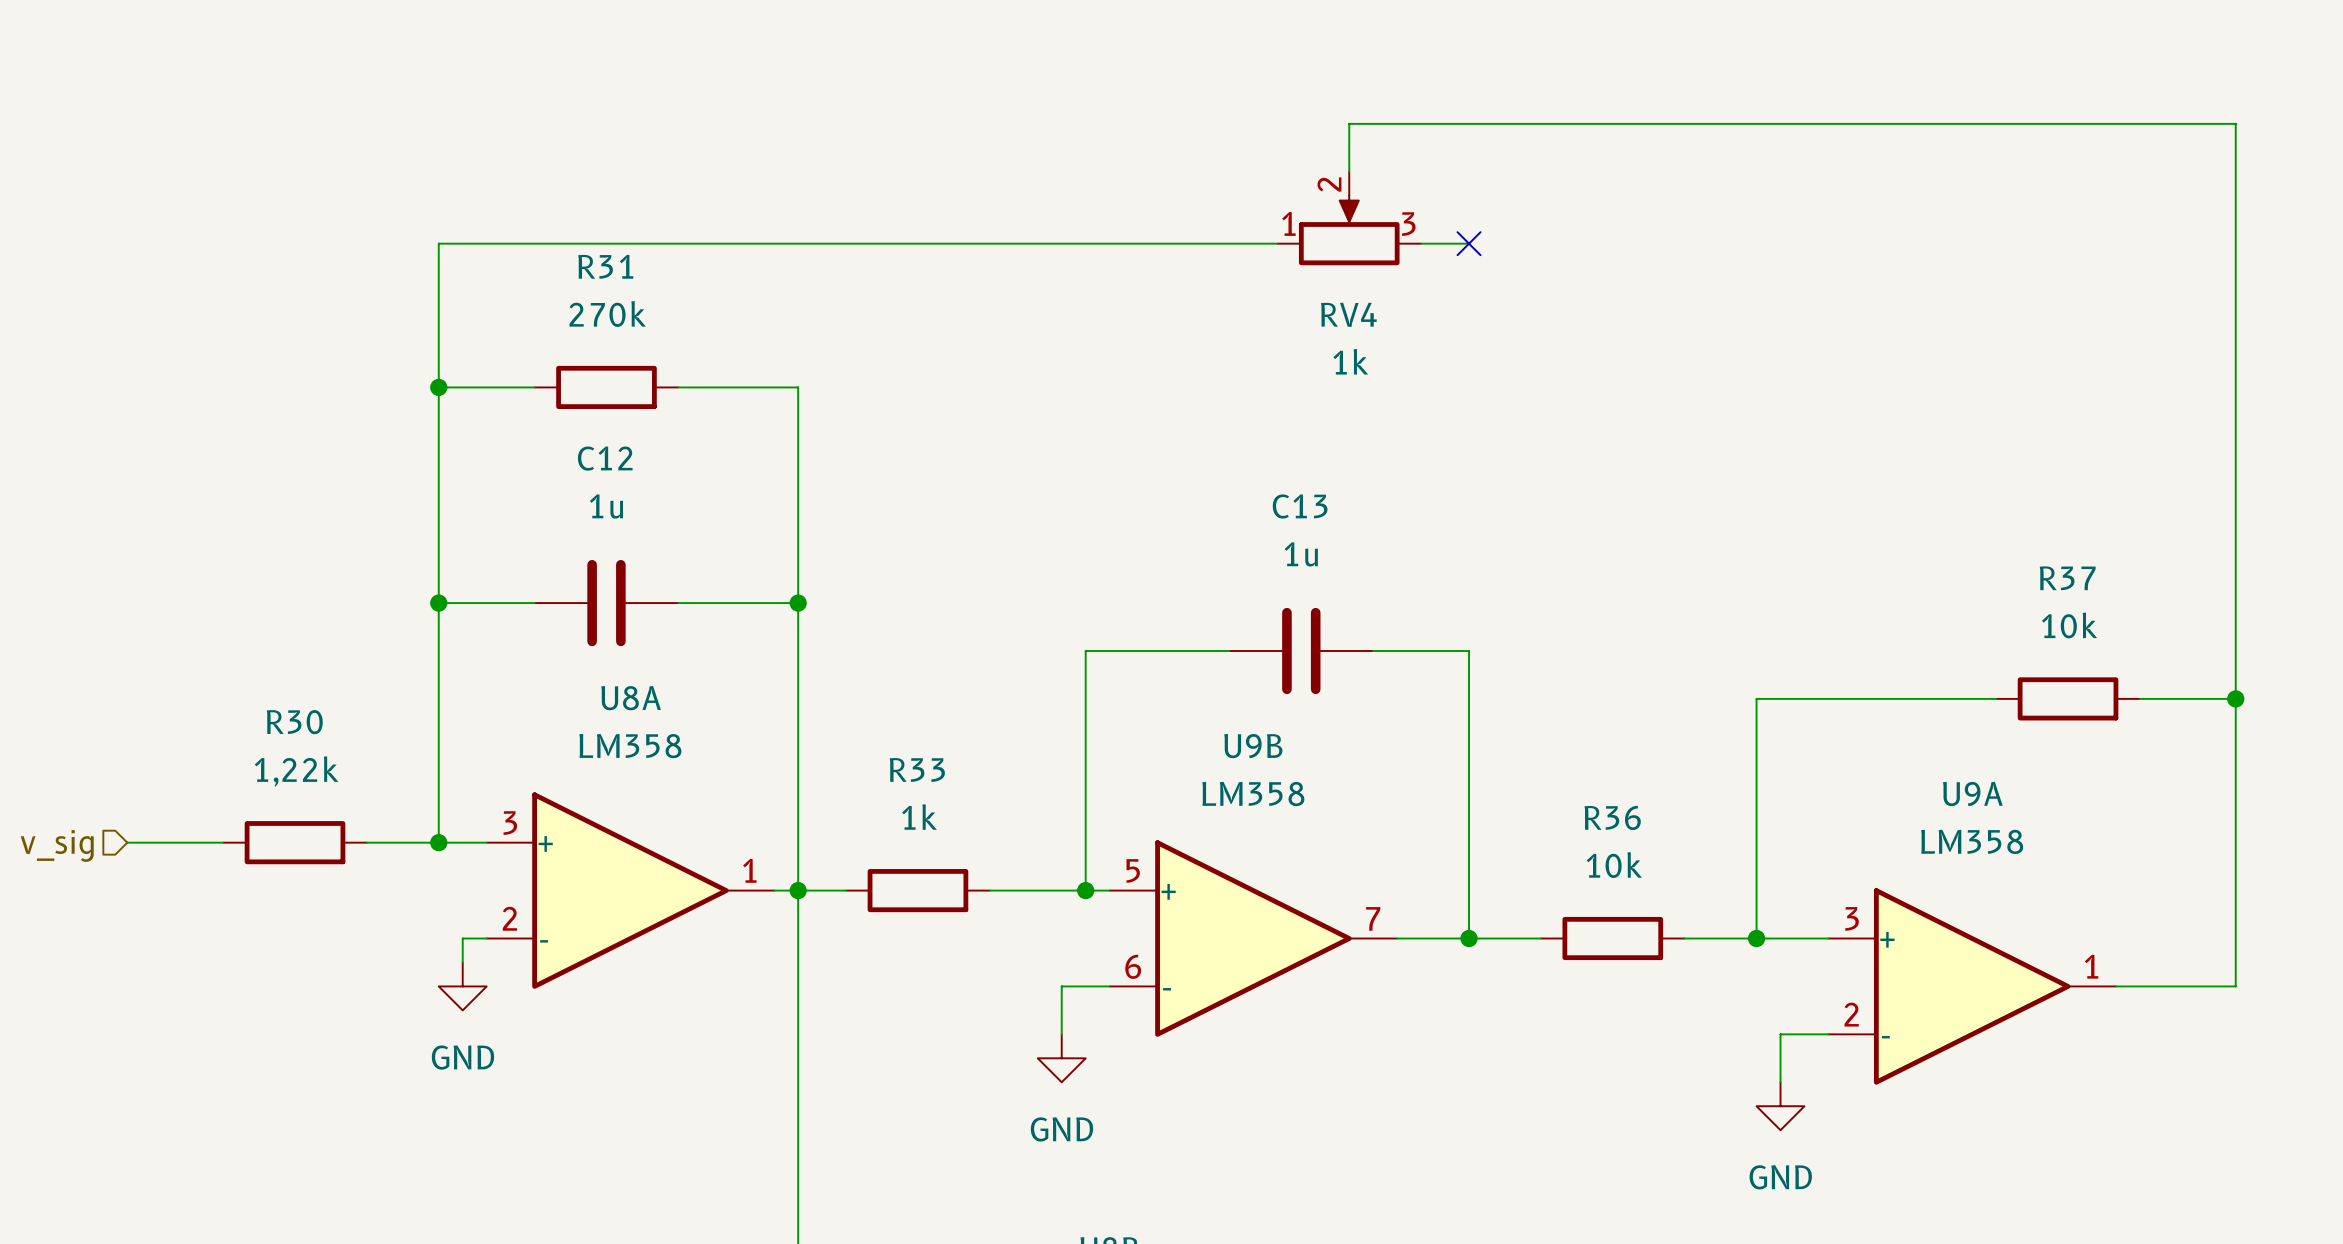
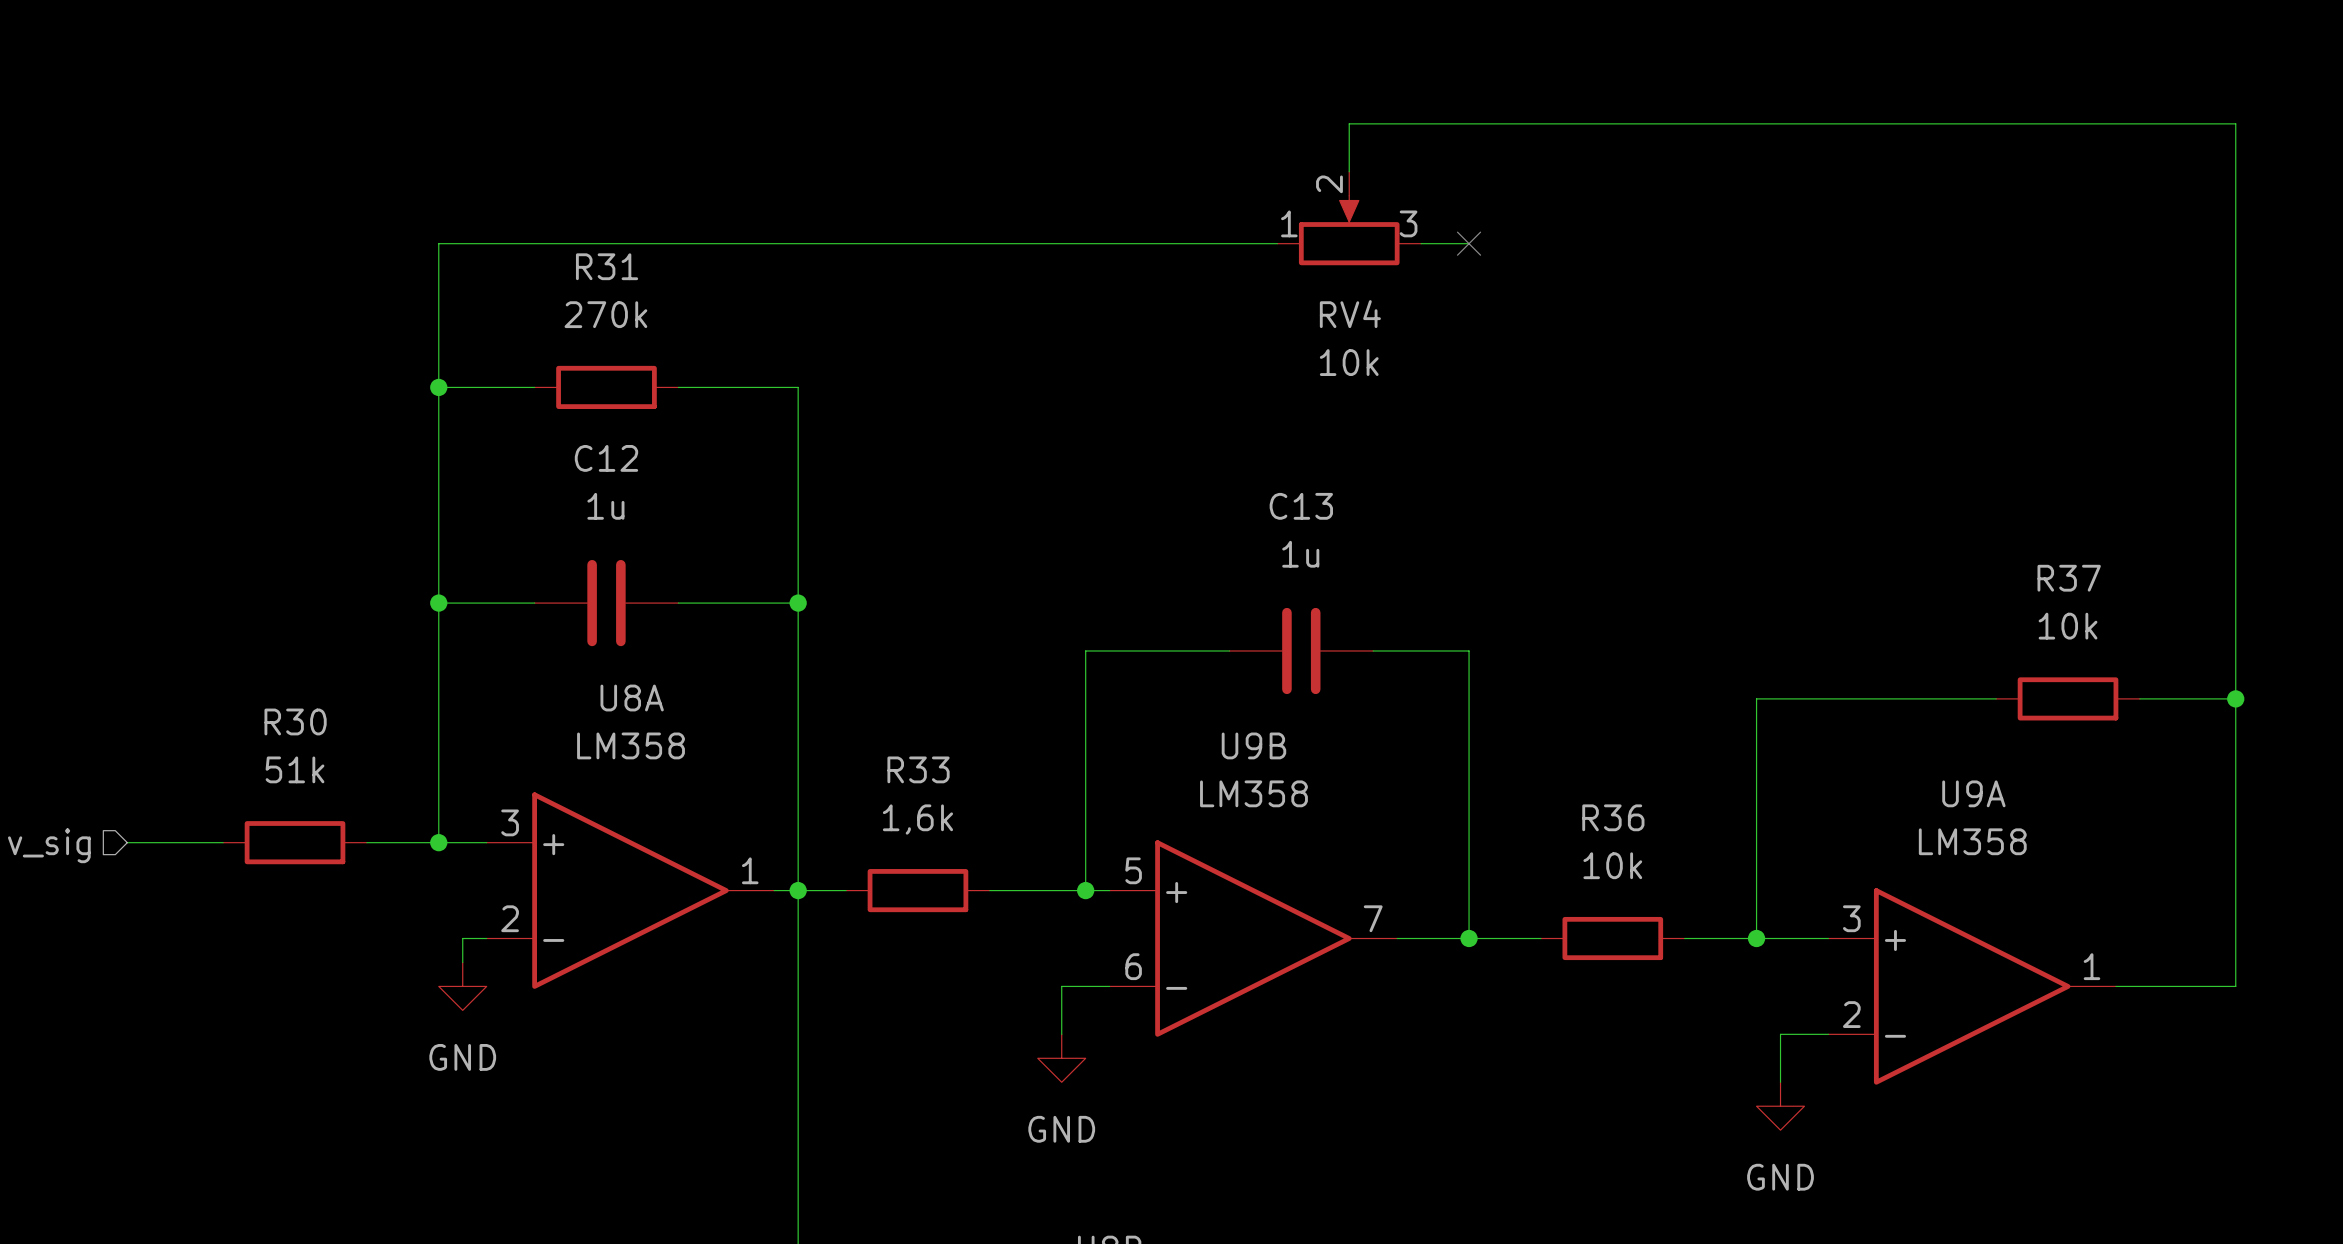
RV4 value: 1k (1350, 361) -> 10k (1349, 362)
R30 value: 1,22k (296, 771) -> 51k (295, 769)
R33 value: 1k (919, 817) -> 1,6k (917, 819)

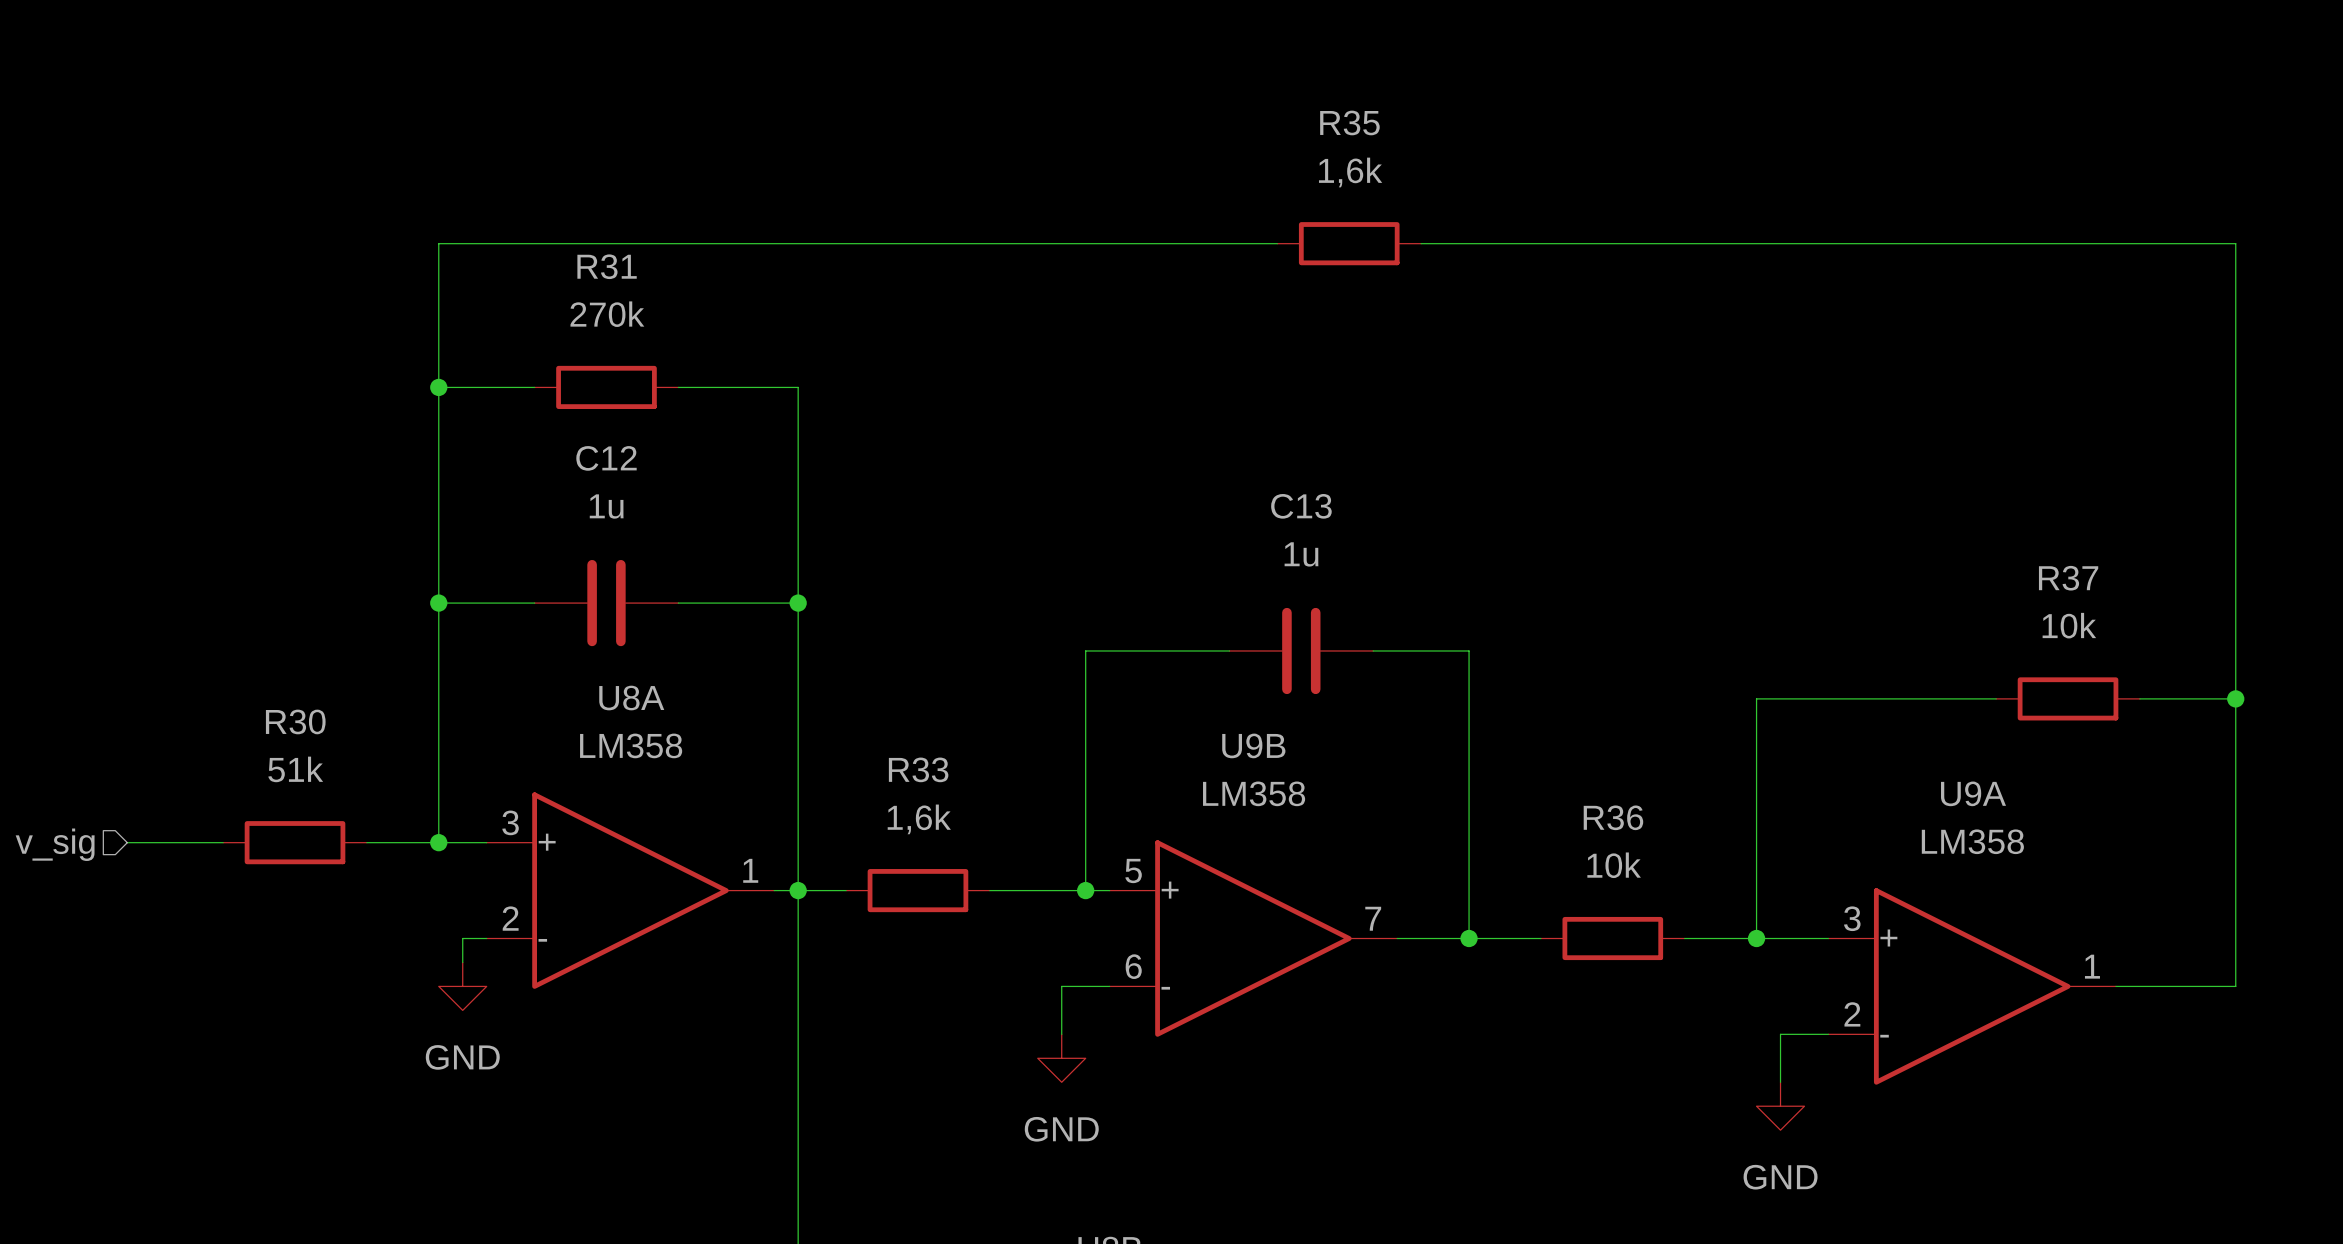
wire: (1349, 171) (1349, 123) (2235, 123) (2235, 243) -> (1469, 243) (2235, 243)
RV4: 10k (1349, 218) -> none
R35: none -> 1,6k (1349, 243)
no-connect mark: (1469, 243) -> none

